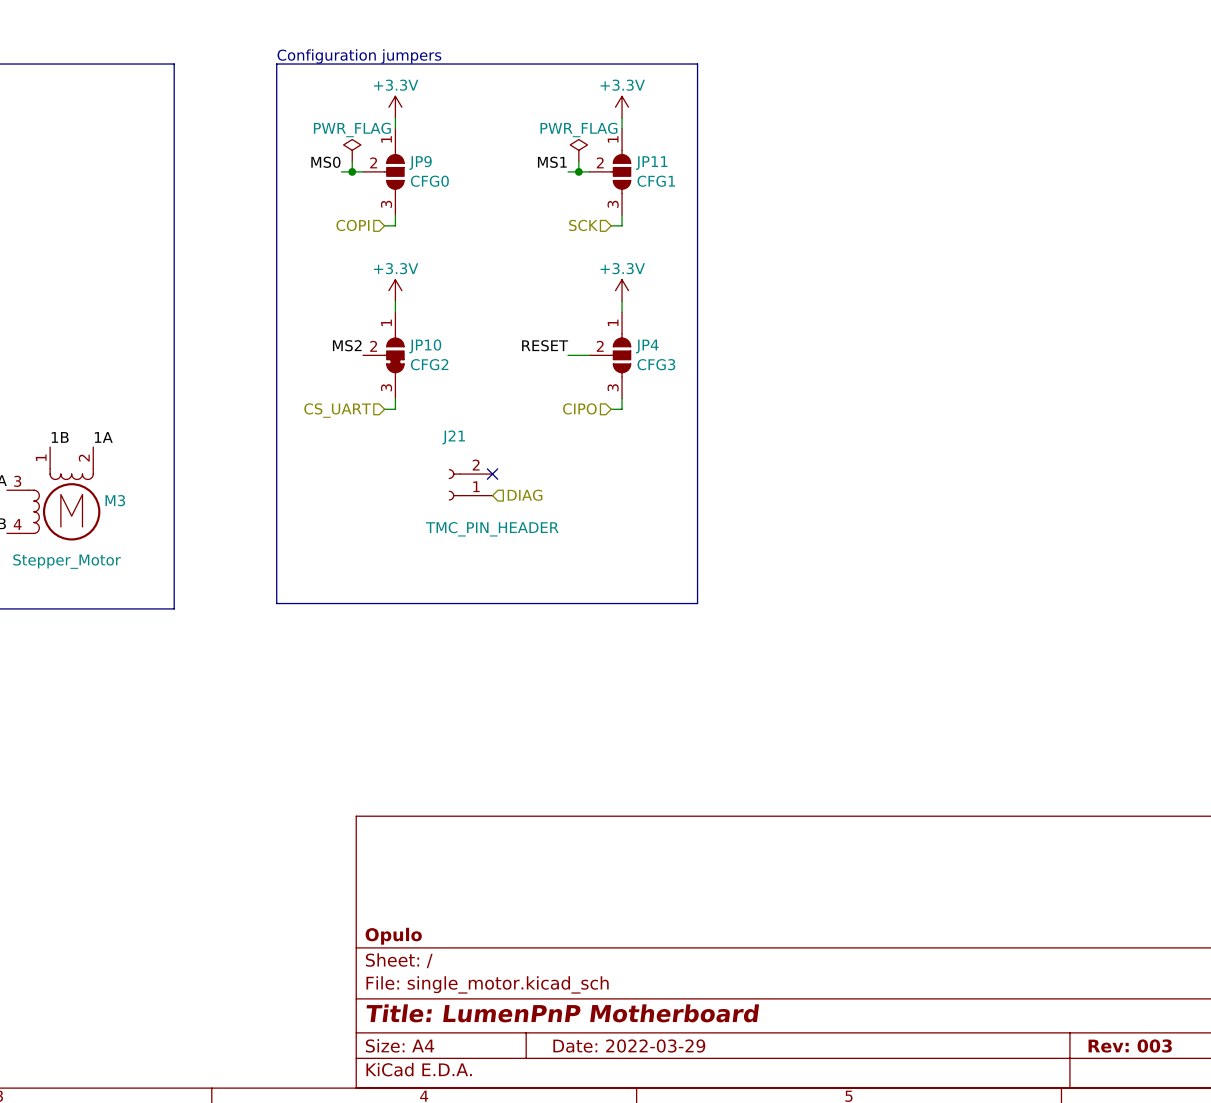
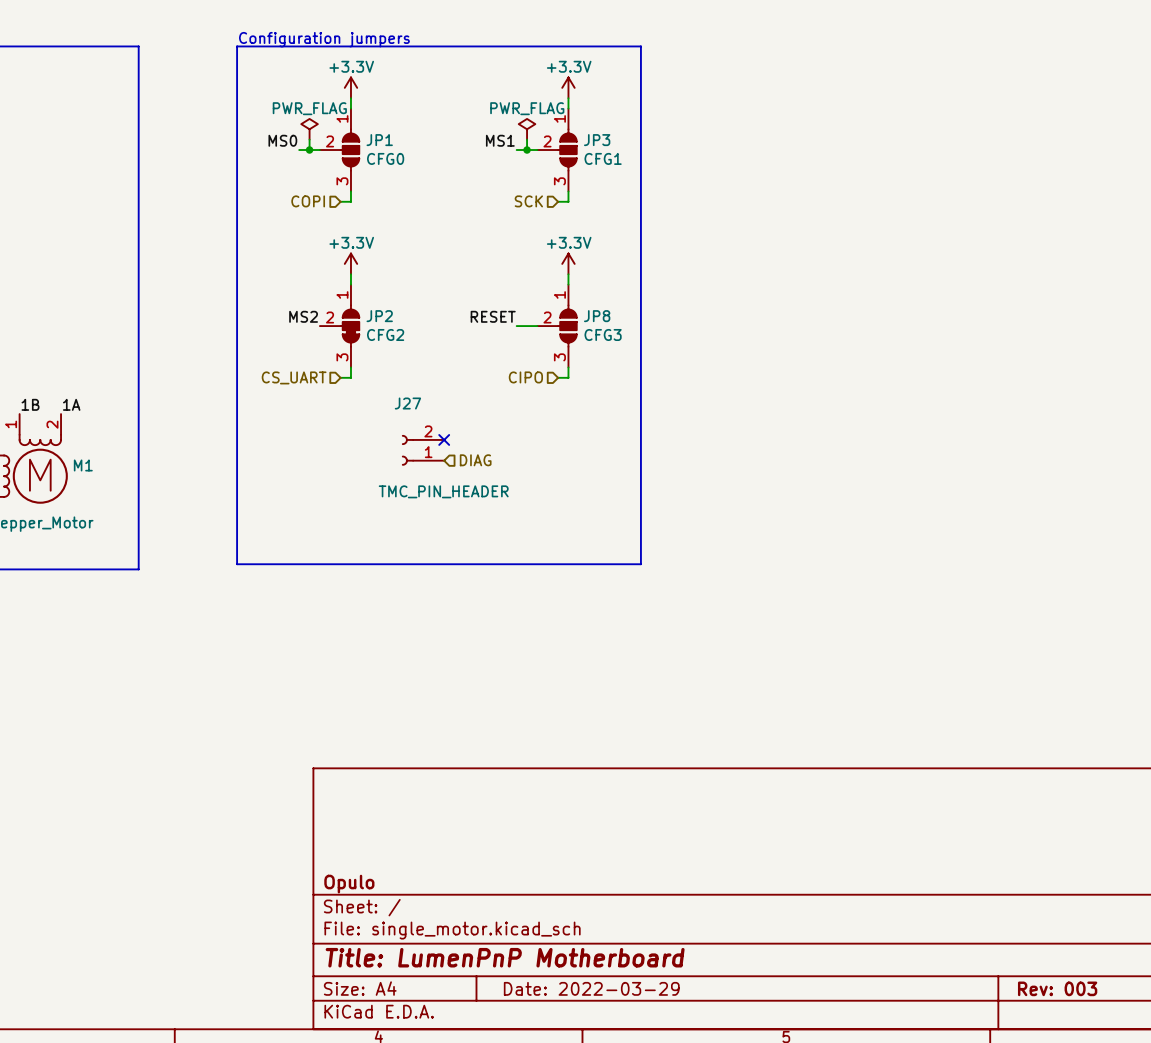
JP9 name: JP9 (420, 162) -> JP1 (379, 140)
JP11 name: JP11 (651, 163) -> JP3 (597, 140)
JP10 name: JP10 (425, 346) -> JP2 (379, 316)
JP4 name: JP4 (647, 346) -> JP8 (597, 316)
J21 name: J21 (453, 437) -> J27 (407, 403)
M3 name: M3 (115, 500) -> M1 (83, 465)

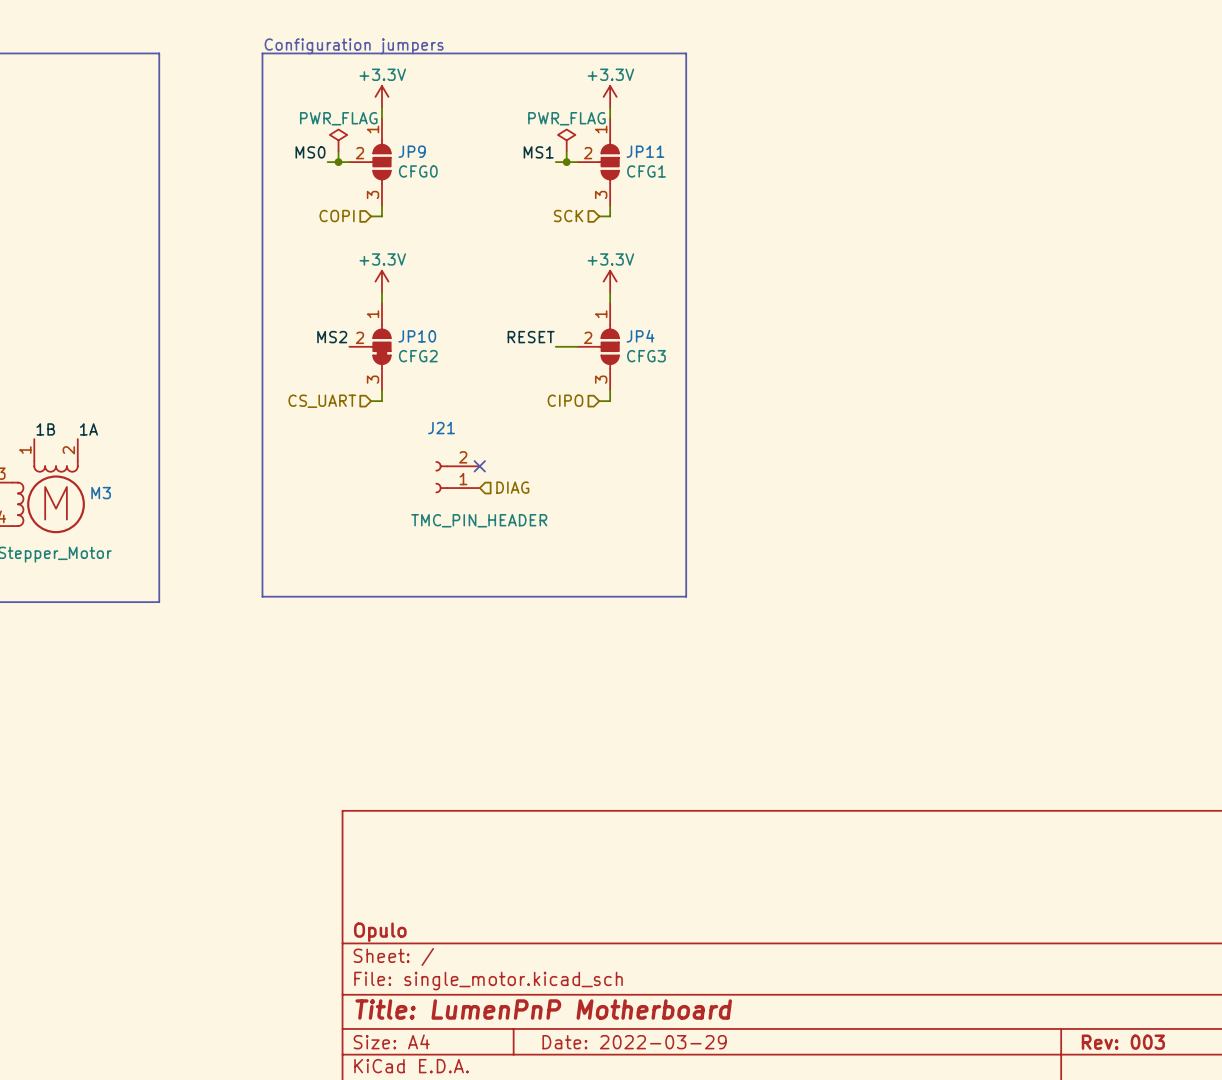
JP1 name: JP1 (379, 140) -> JP9 (412, 151)
JP3 name: JP3 (597, 140) -> JP11 (645, 151)
JP2 name: JP2 (379, 316) -> JP10 (417, 336)
JP8 name: JP8 (597, 316) -> JP4 (640, 336)
J27 name: J27 (407, 403) -> J21 (441, 428)
M1 name: M1 (83, 465) -> M3 (101, 493)

